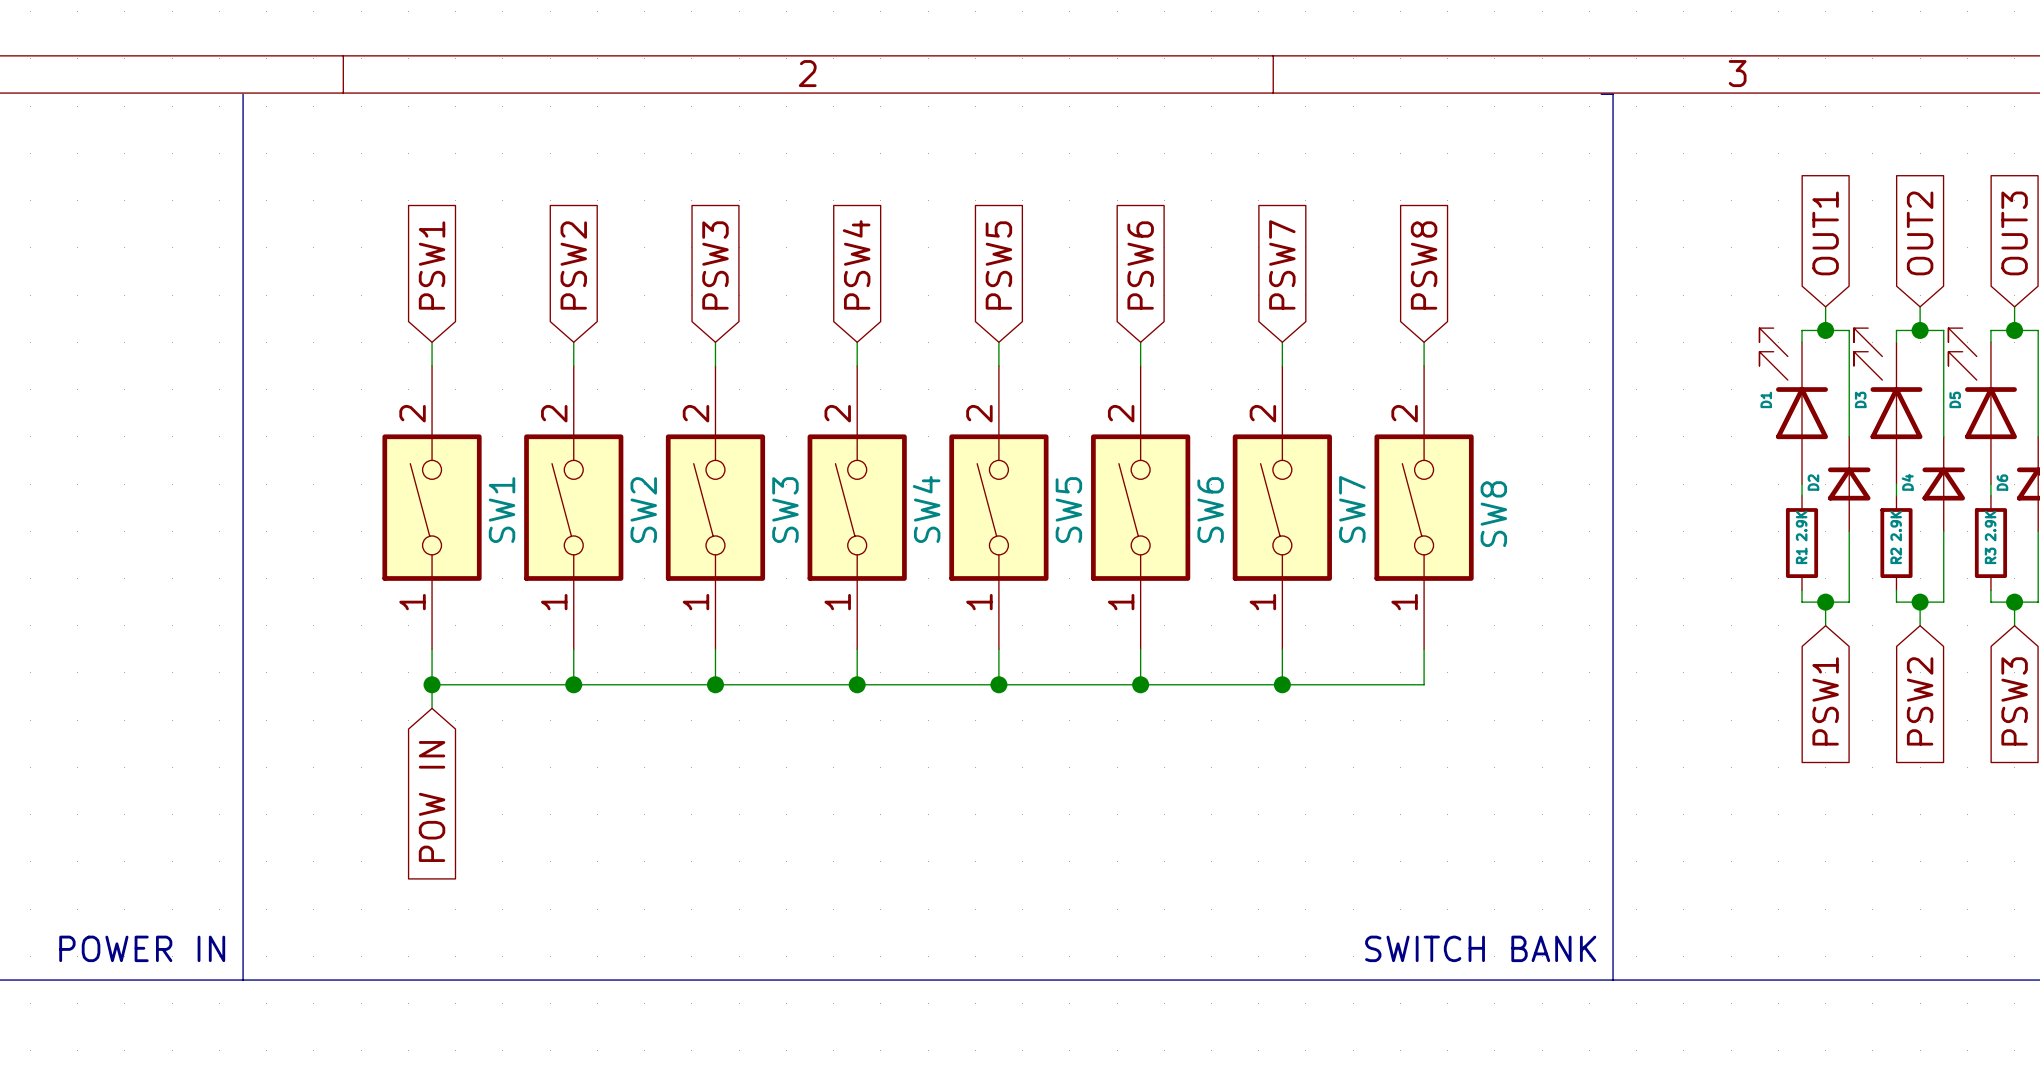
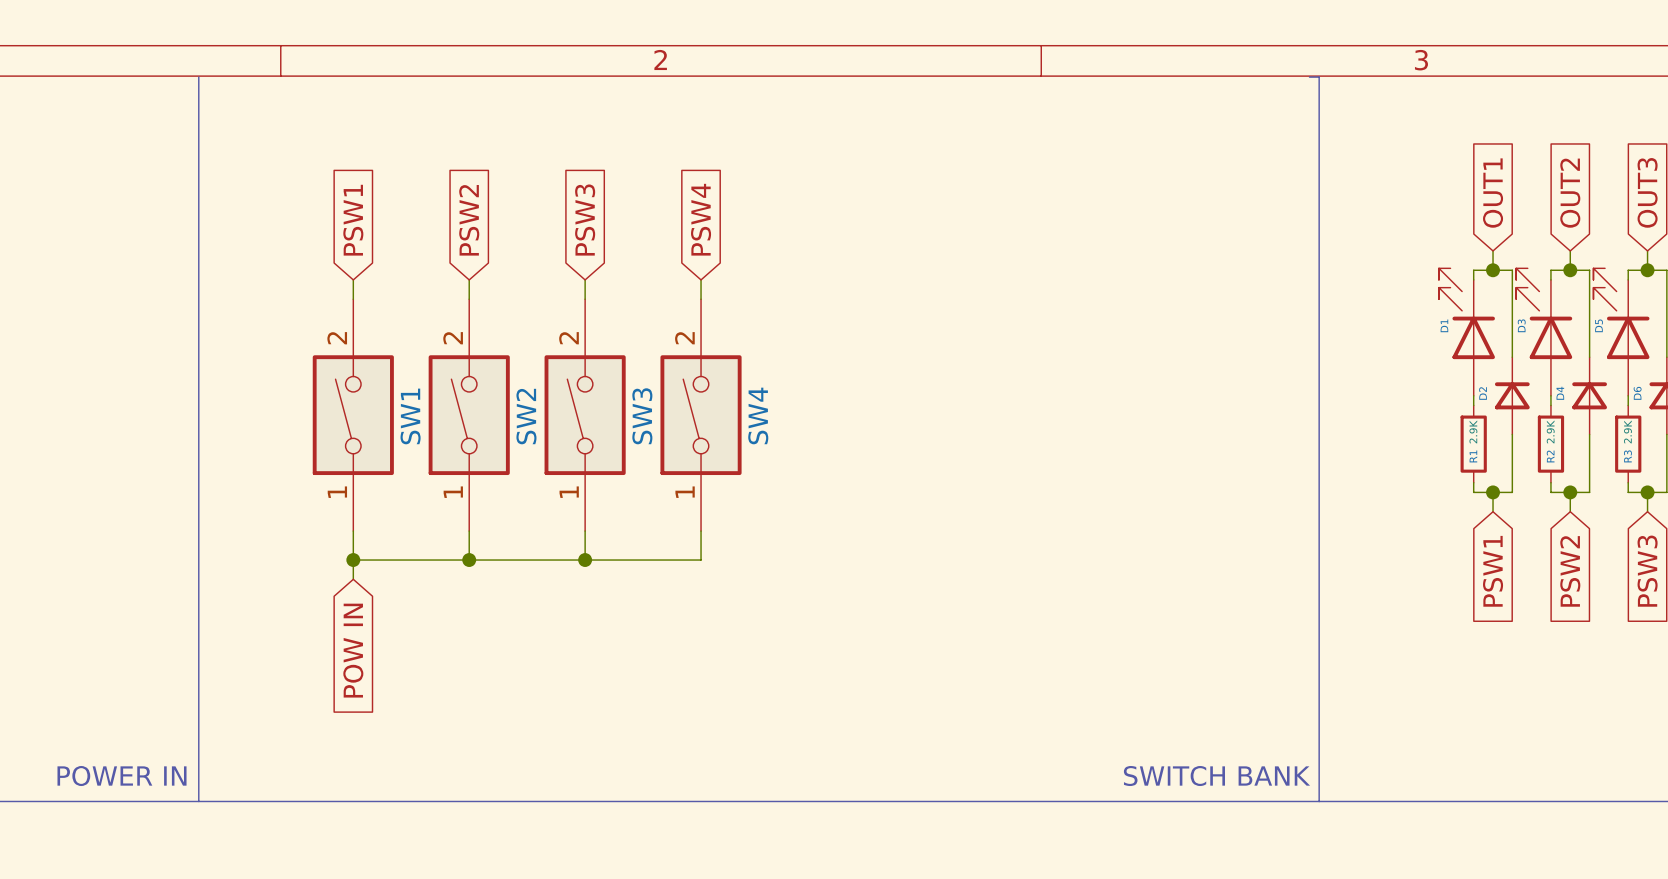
global label: PSW7 (1282, 264) -> none
global label: PSW5 (998, 265) -> none
global label: PSW6 (1140, 265) -> none
global label: PSW8 (1424, 265) -> none
wire: (998, 342) (998, 365) -> none
wire: (1140, 342) (1140, 365) -> none
wire: (1282, 342) (1282, 365) -> none
wire: (1424, 342) (1424, 365) -> none
SW5: (998, 507) -> none
SW6: (1140, 507) -> none
SW7: (1282, 507) -> none
SW8: (1424, 507) -> none
wire: (998, 649) (998, 684) -> none
wire: (1140, 649) (1140, 684) -> none
wire: (1282, 649) (1282, 684) -> none
wire: (1424, 649) (1424, 684) (857, 684) -> none
junction: (857, 684) -> none
junction: (998, 684) -> none
junction: (1140, 684) -> none
junction: (1282, 684) -> none

